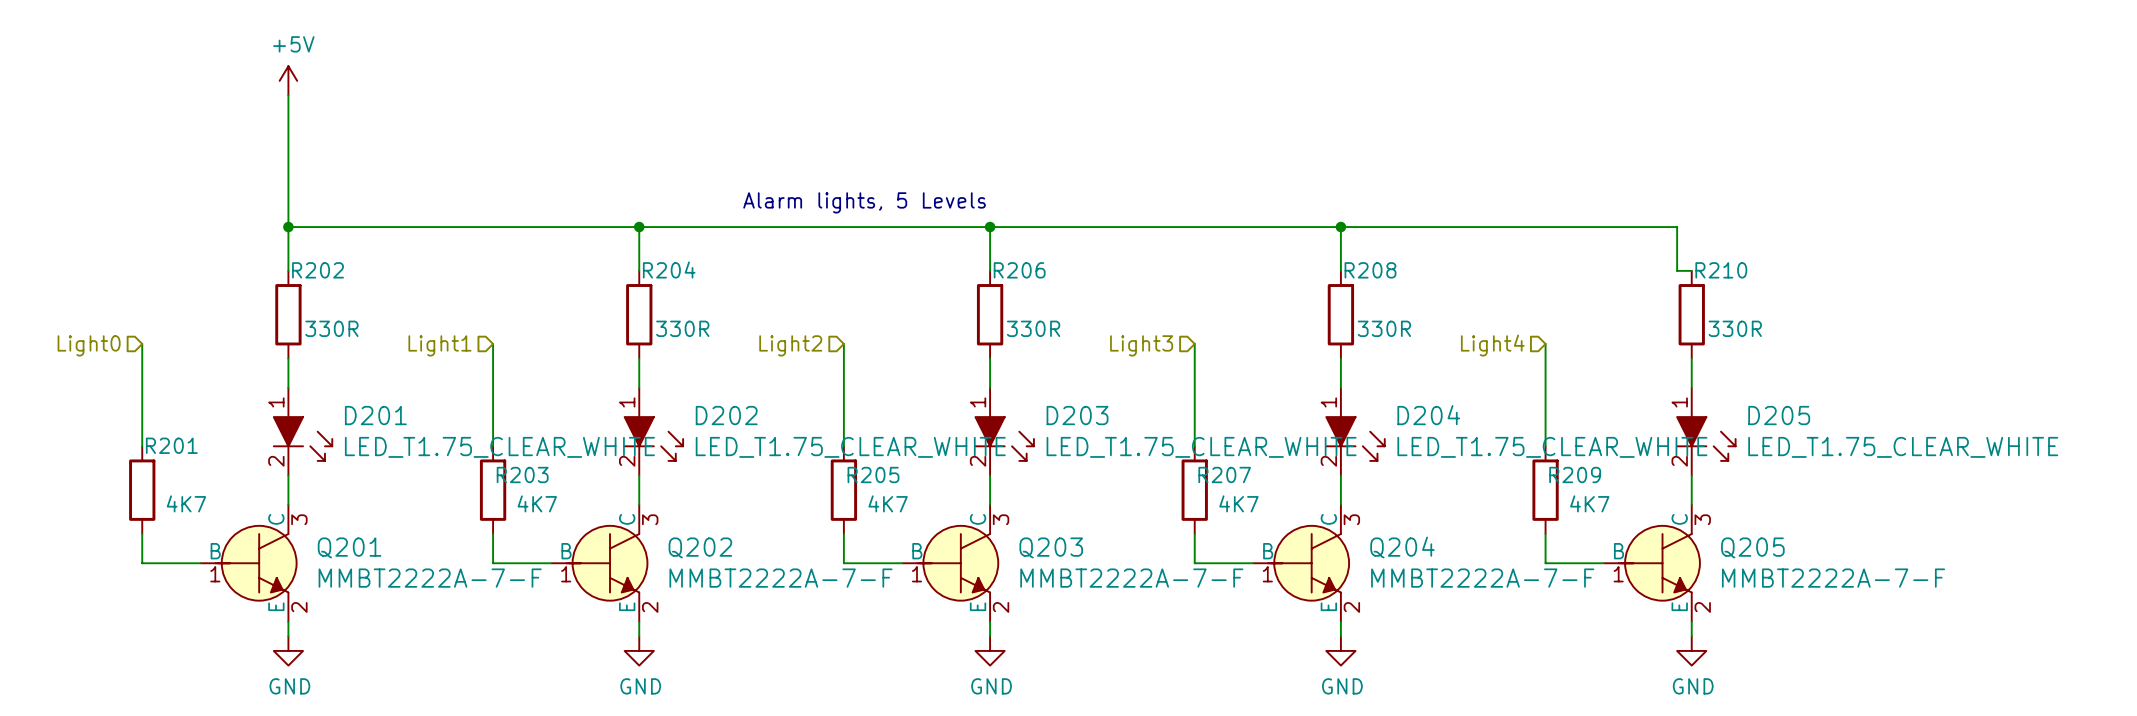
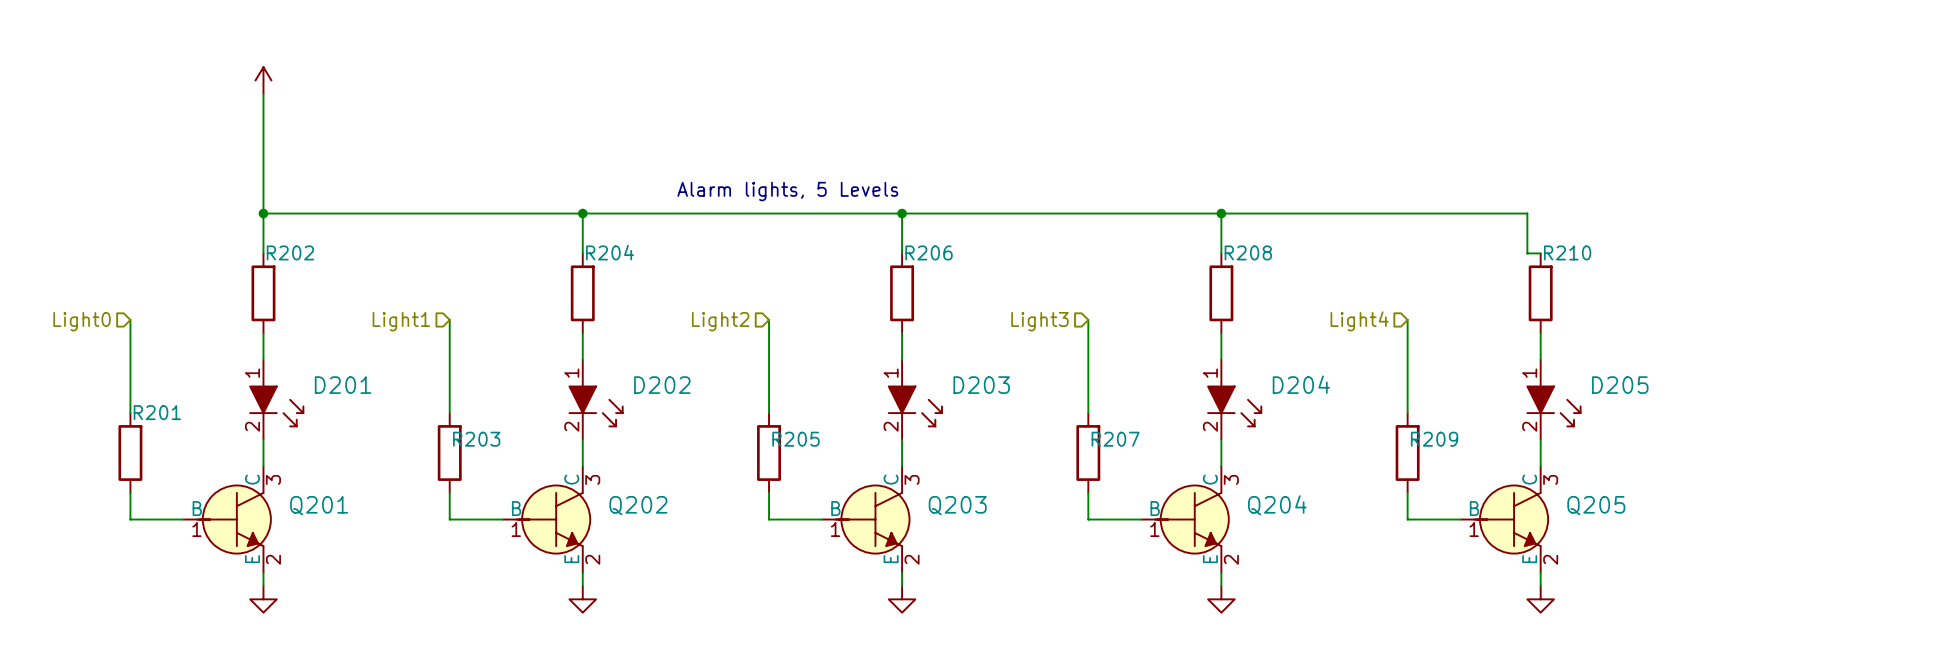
power symbol text: +5V (293, 44) -> none
R202 value: 330R (331, 328) -> none
R204 value: 330R (682, 328) -> none
R206 value: 330R (1033, 328) -> none
R208 value: 330R (1384, 328) -> none
R210 value: 330R (1735, 328) -> none
D201 value: LED_T1.75_CLEAR_WHITE (499, 447) -> none
D202 value: LED_T1.75_CLEAR_WHITE (850, 447) -> none
D203 value: LED_T1.75_CLEAR_WHITE (1201, 447) -> none
D204 value: LED_T1.75_CLEAR_WHITE (1552, 447) -> none
D205 value: LED_T1.75_CLEAR_WHITE (1903, 447) -> none
R201 value: 4K7 (186, 503) -> none
R203 value: 4K7 (537, 503) -> none
R205 value: 4K7 (888, 503) -> none
R207 value: 4K7 (1238, 503) -> none
R209 value: 4K7 (1589, 503) -> none
Q201 value: MMBT2222A-7-F (430, 578) -> none
Q202 value: MMBT2222A-7-F (780, 578) -> none
Q203 value: MMBT2222A-7-F (1131, 578) -> none
Q204 value: MMBT2222A-7-F (1482, 578) -> none
Q205 value: MMBT2222A-7-F (1833, 578) -> none
power symbol text: GND (289, 686) -> none
power symbol text: GND (640, 686) -> none
power symbol text: GND (991, 686) -> none
power symbol text: GND (1342, 686) -> none
power symbol text: GND (1693, 686) -> none

